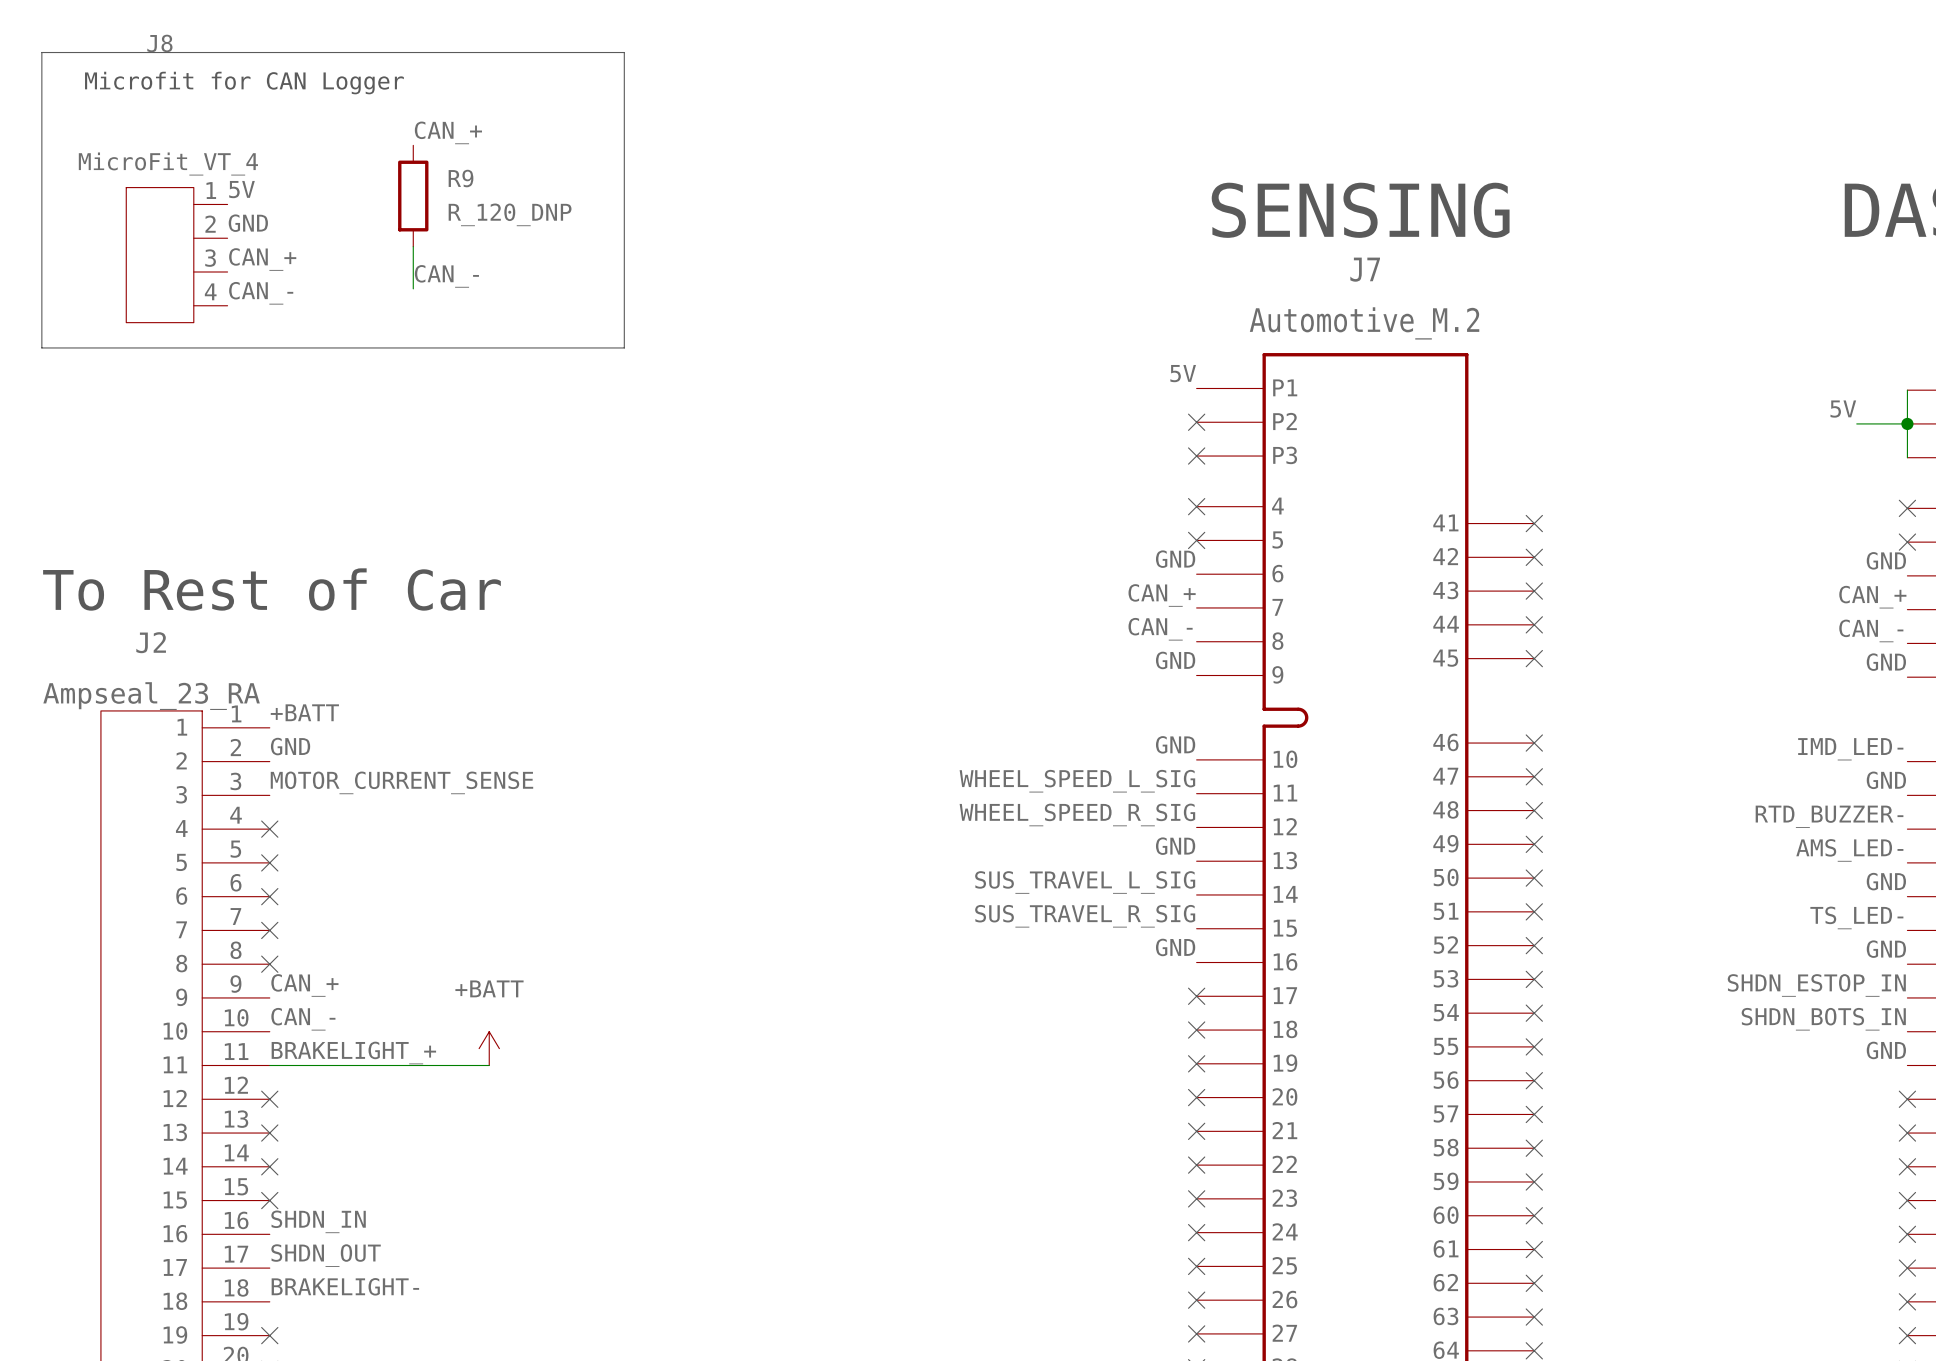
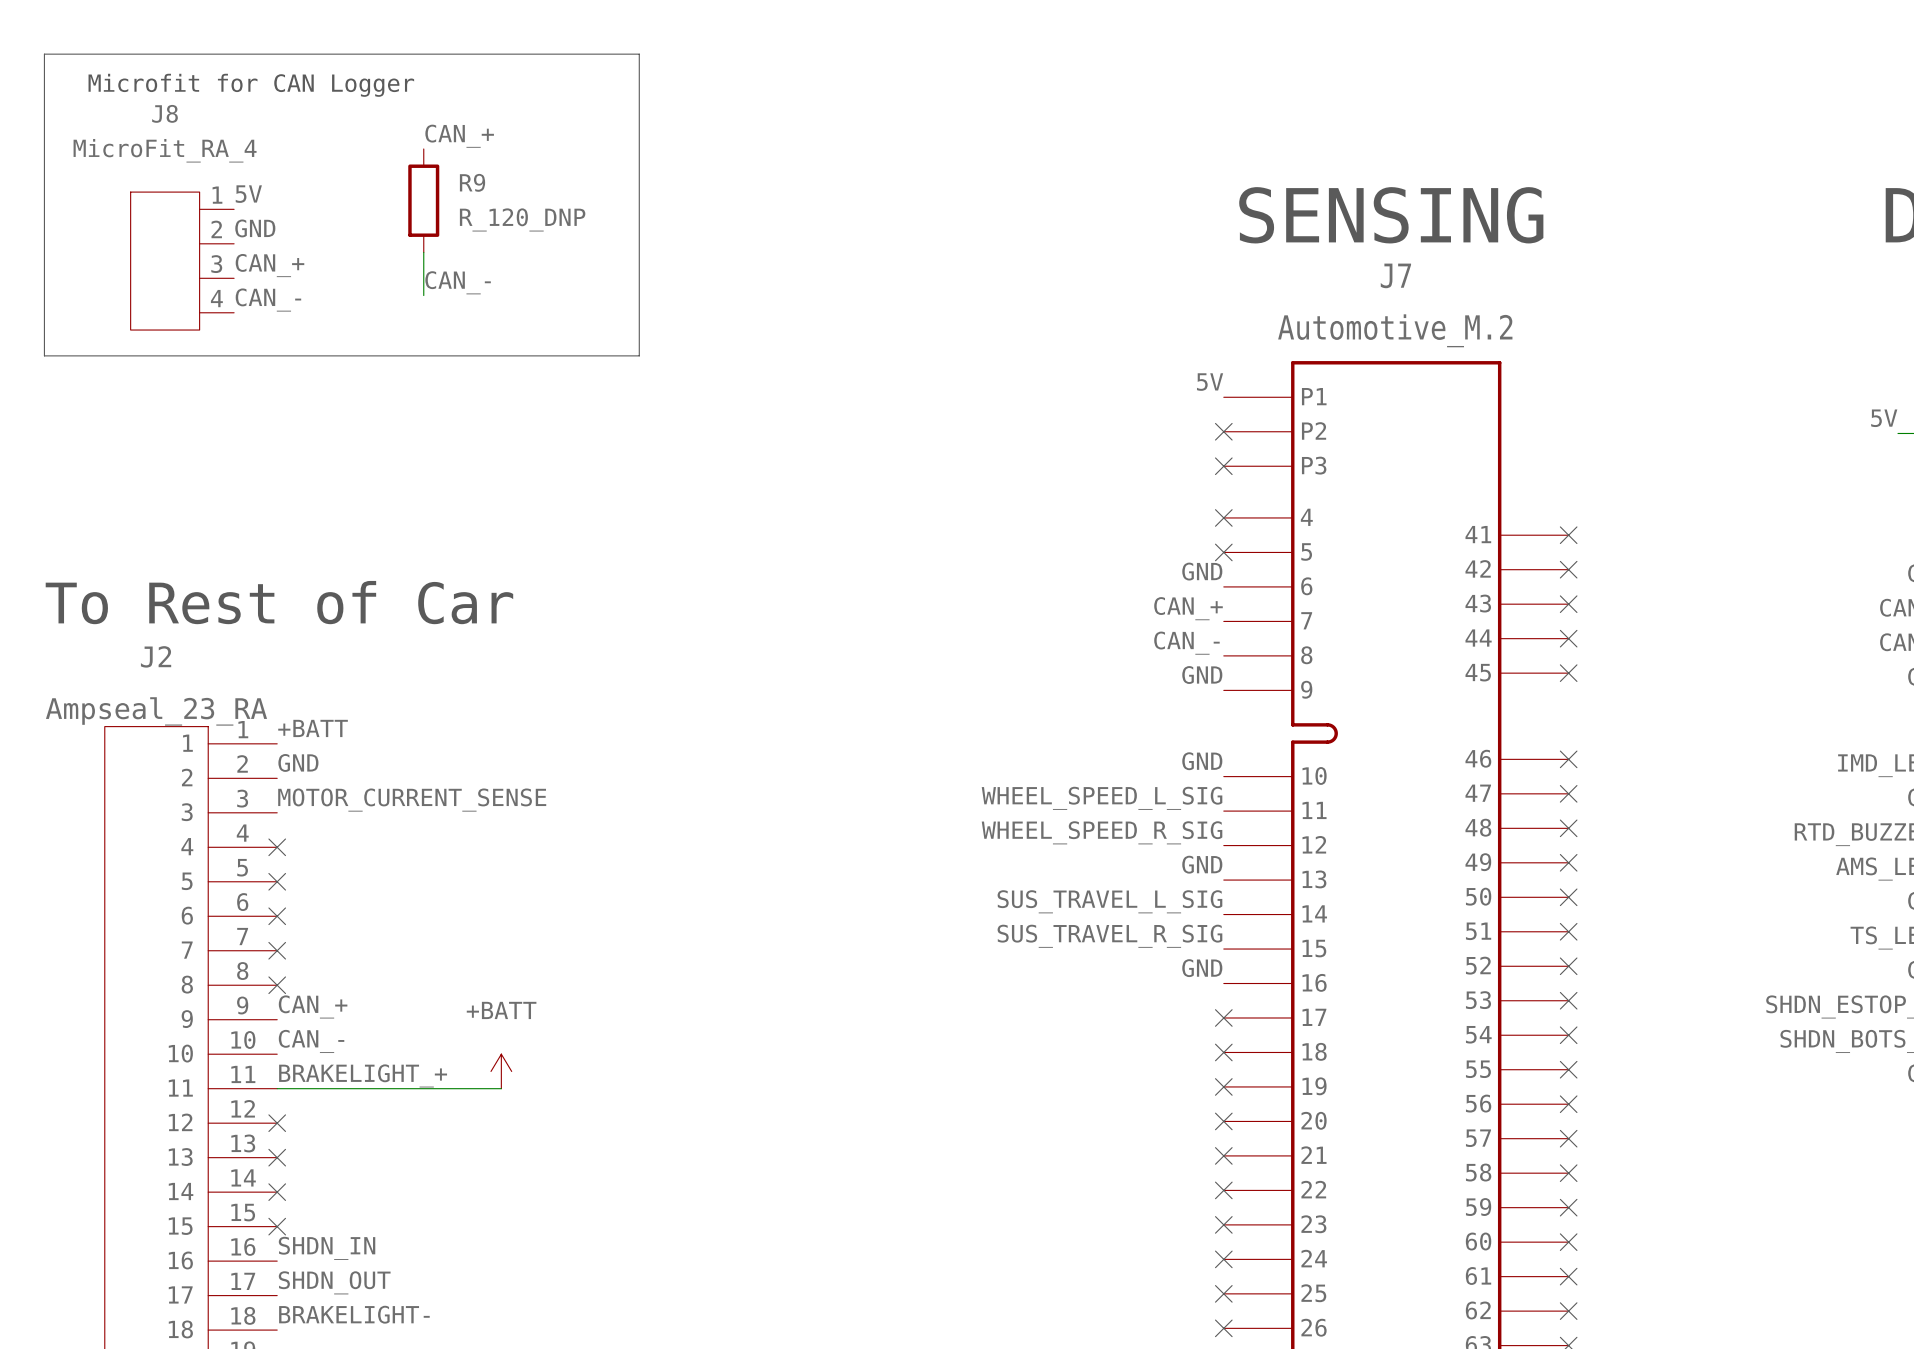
J8 name position: J8 (159, 43) -> J8 (165, 113)
J8 value: MicroFit_VT_4 (168, 164) -> MicroFit_RA_4 (165, 150)

